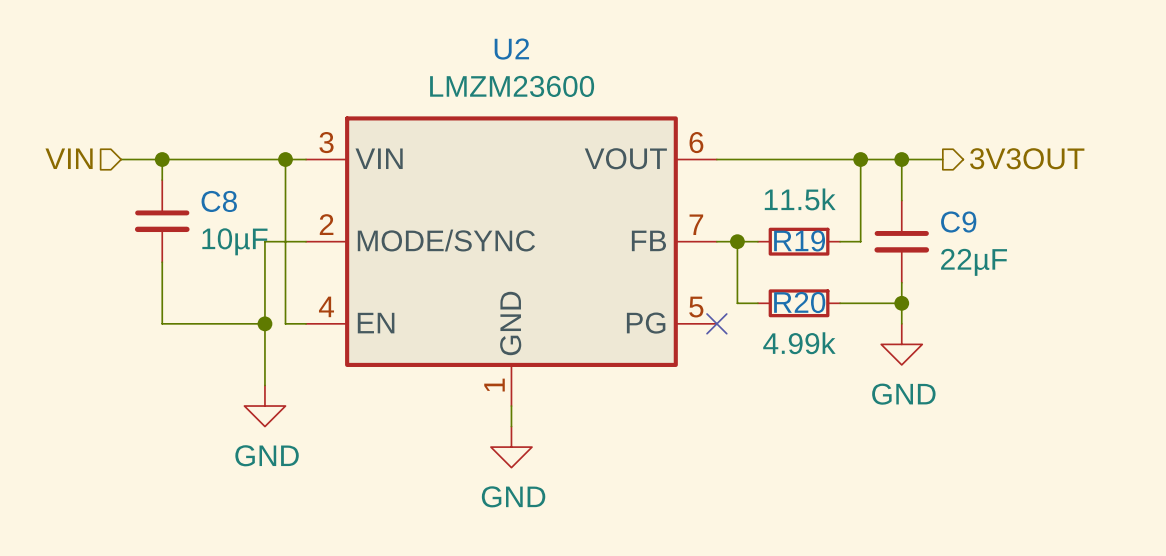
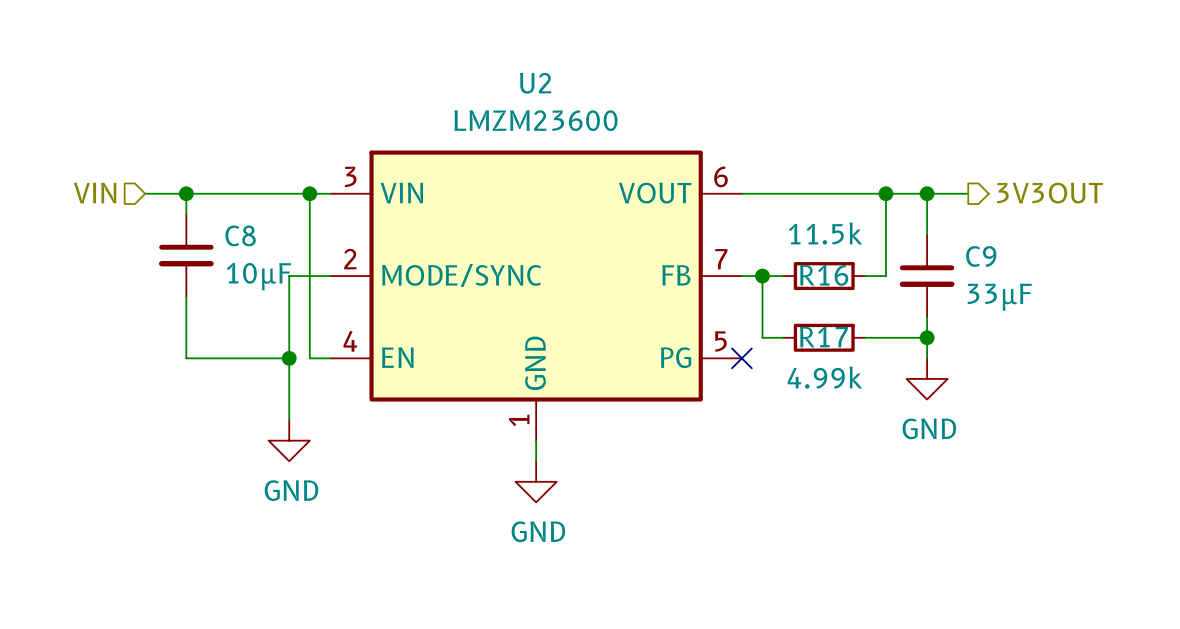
R19 name: R19 (799, 240) -> R16 (824, 275)
C9 value: 22µF (974, 262) -> 33µF (999, 297)
R20 name: R20 (799, 302) -> R17 (823, 337)

